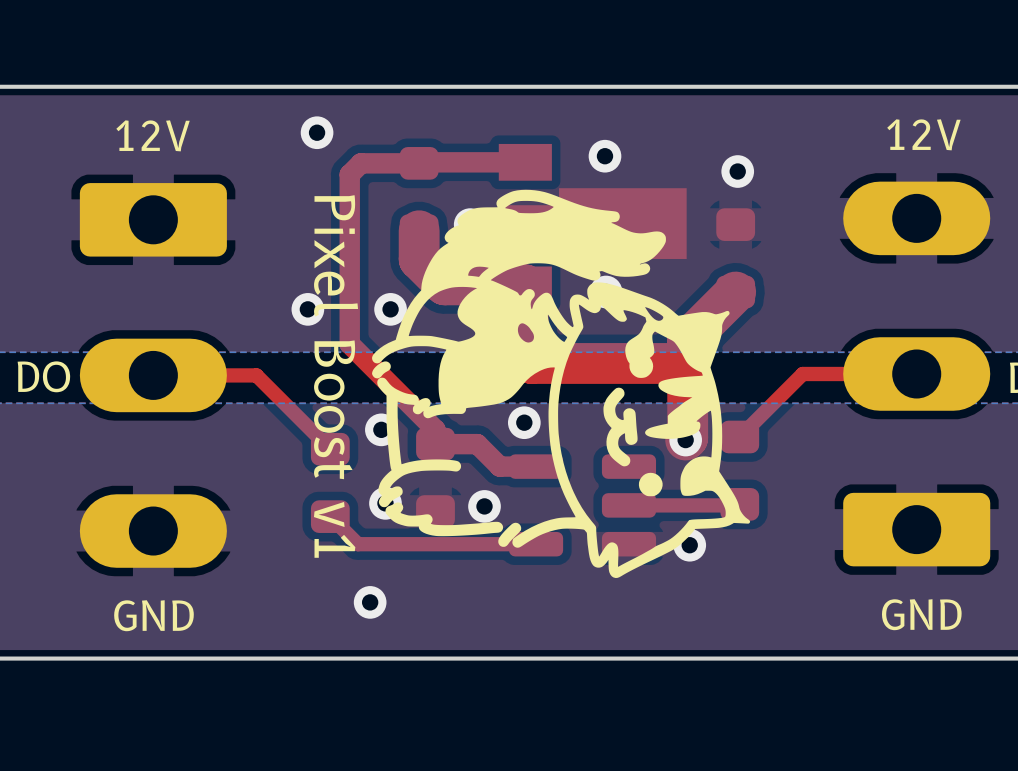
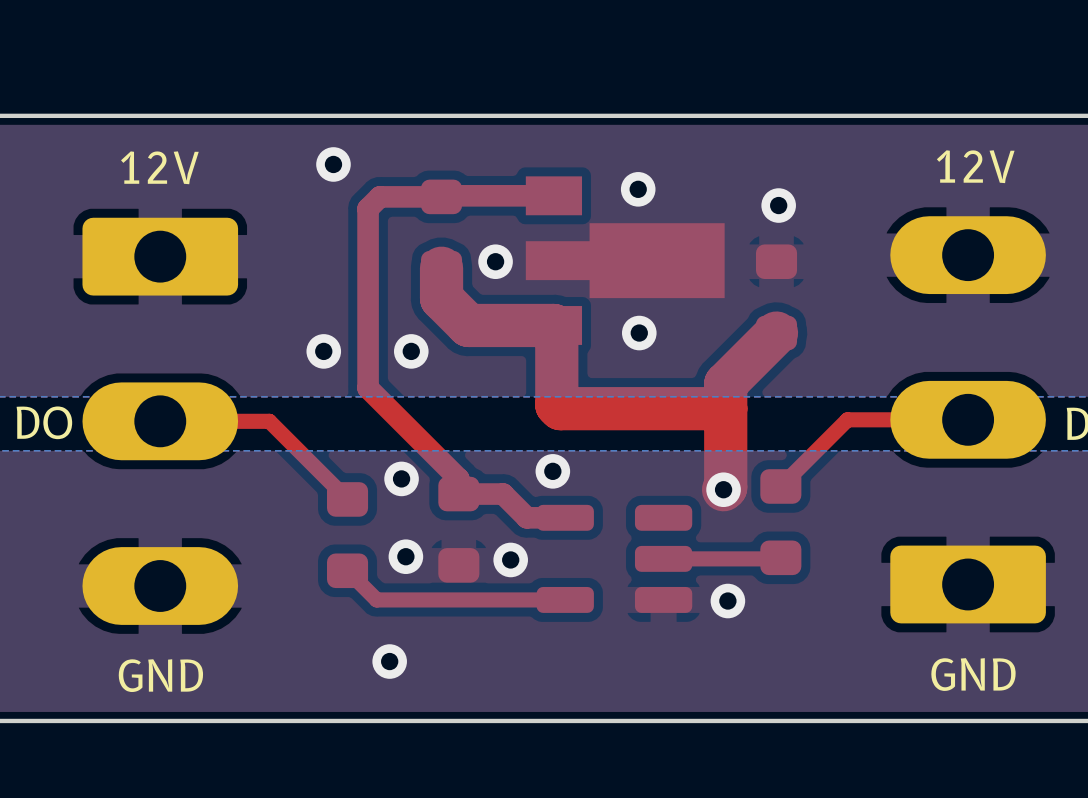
drawing: [372, 189, 751, 579] -> none
text: Pixel Boost v1 (335, 376) -> none

